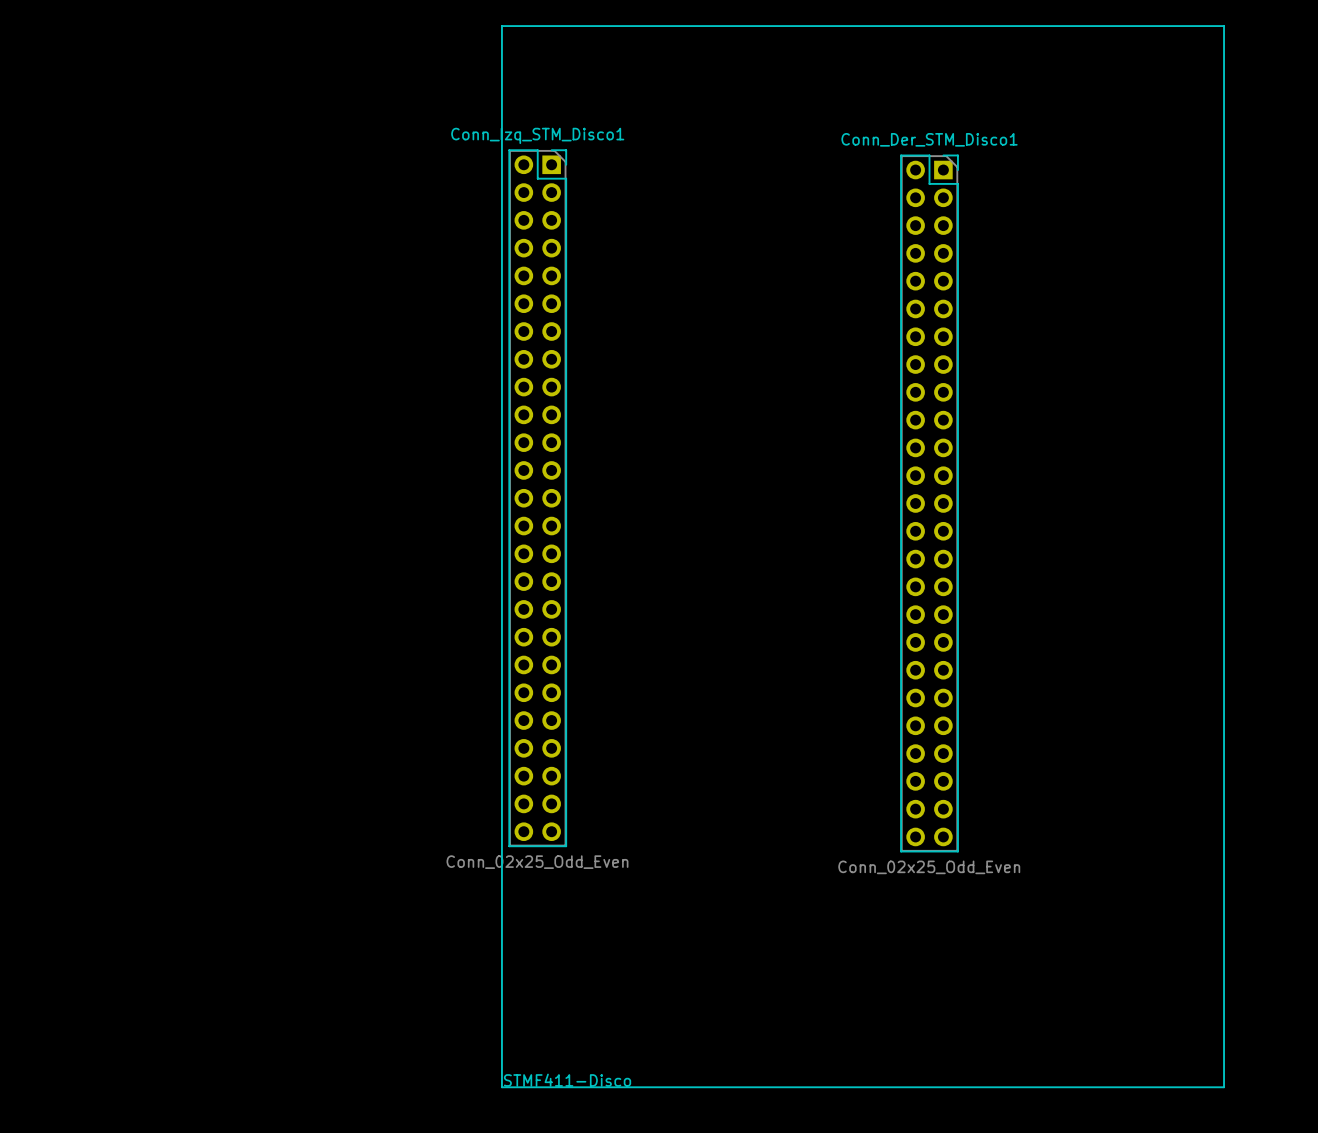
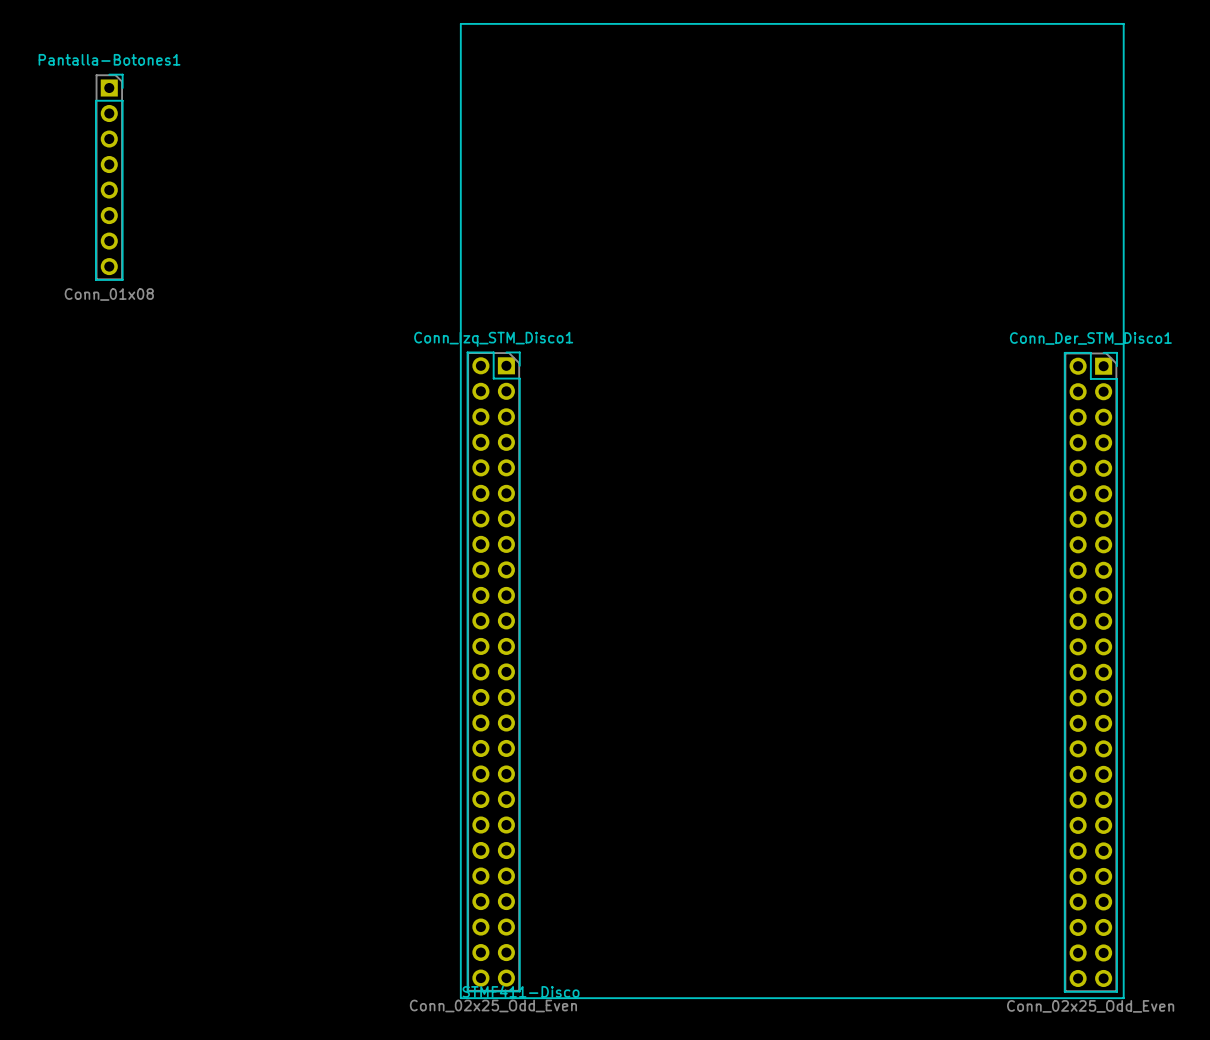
Pantalla-Botones1: none -> Conn_01x08 (109, 177)
Conn_Izq_STM_Disco1 position: (537, 498) -> (493, 671)
Conn_Der_STM_Disco1 position: (929, 503) -> (1090, 672)

